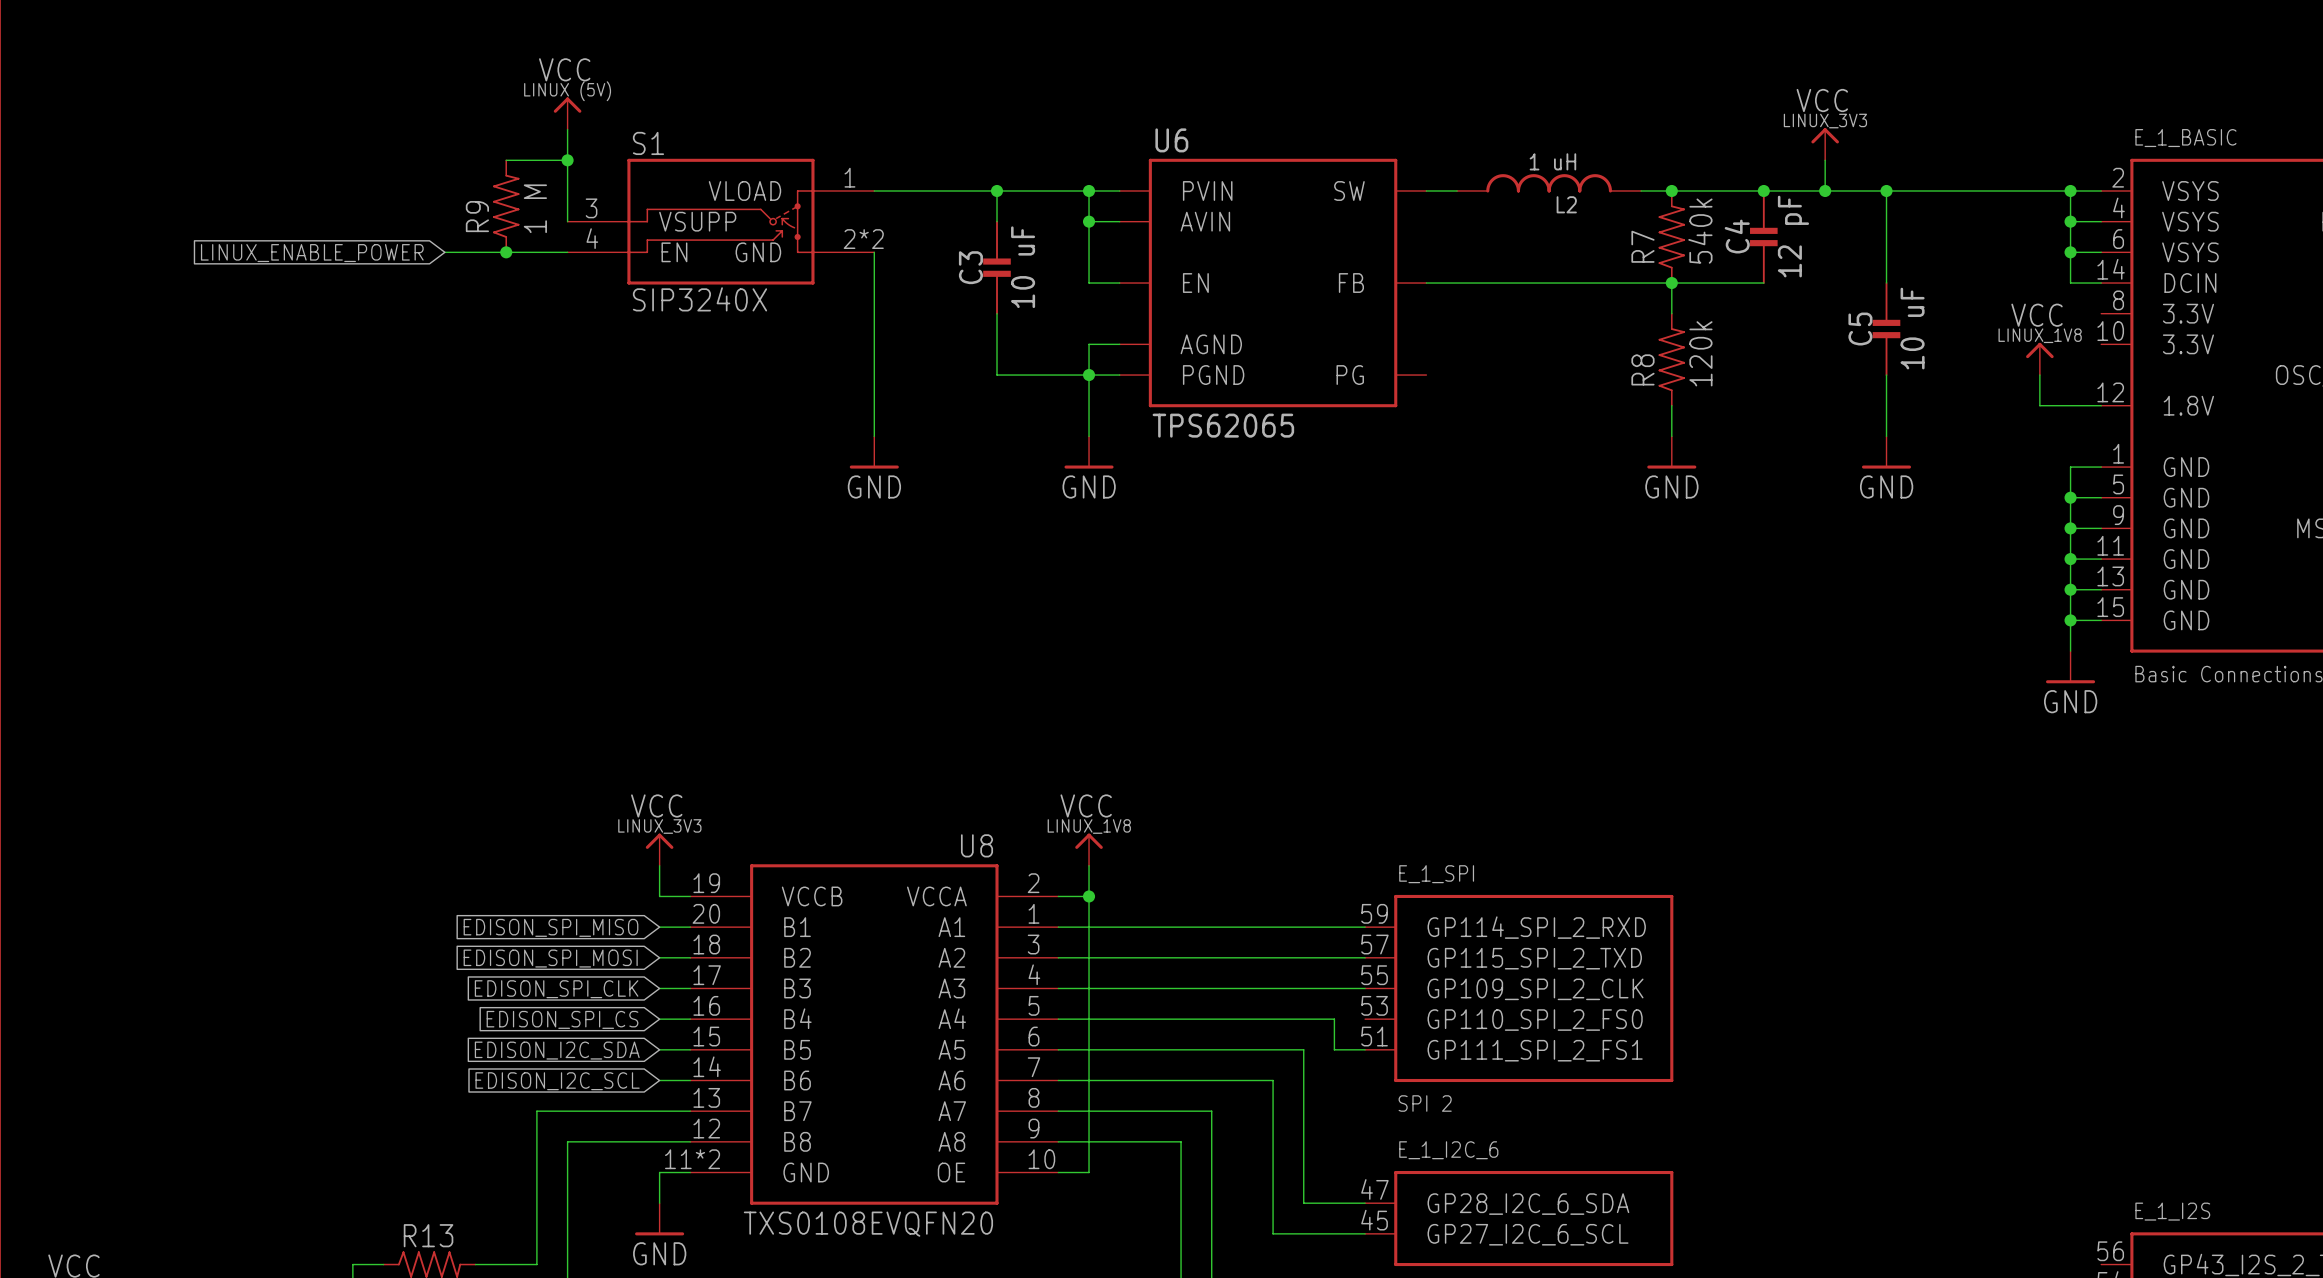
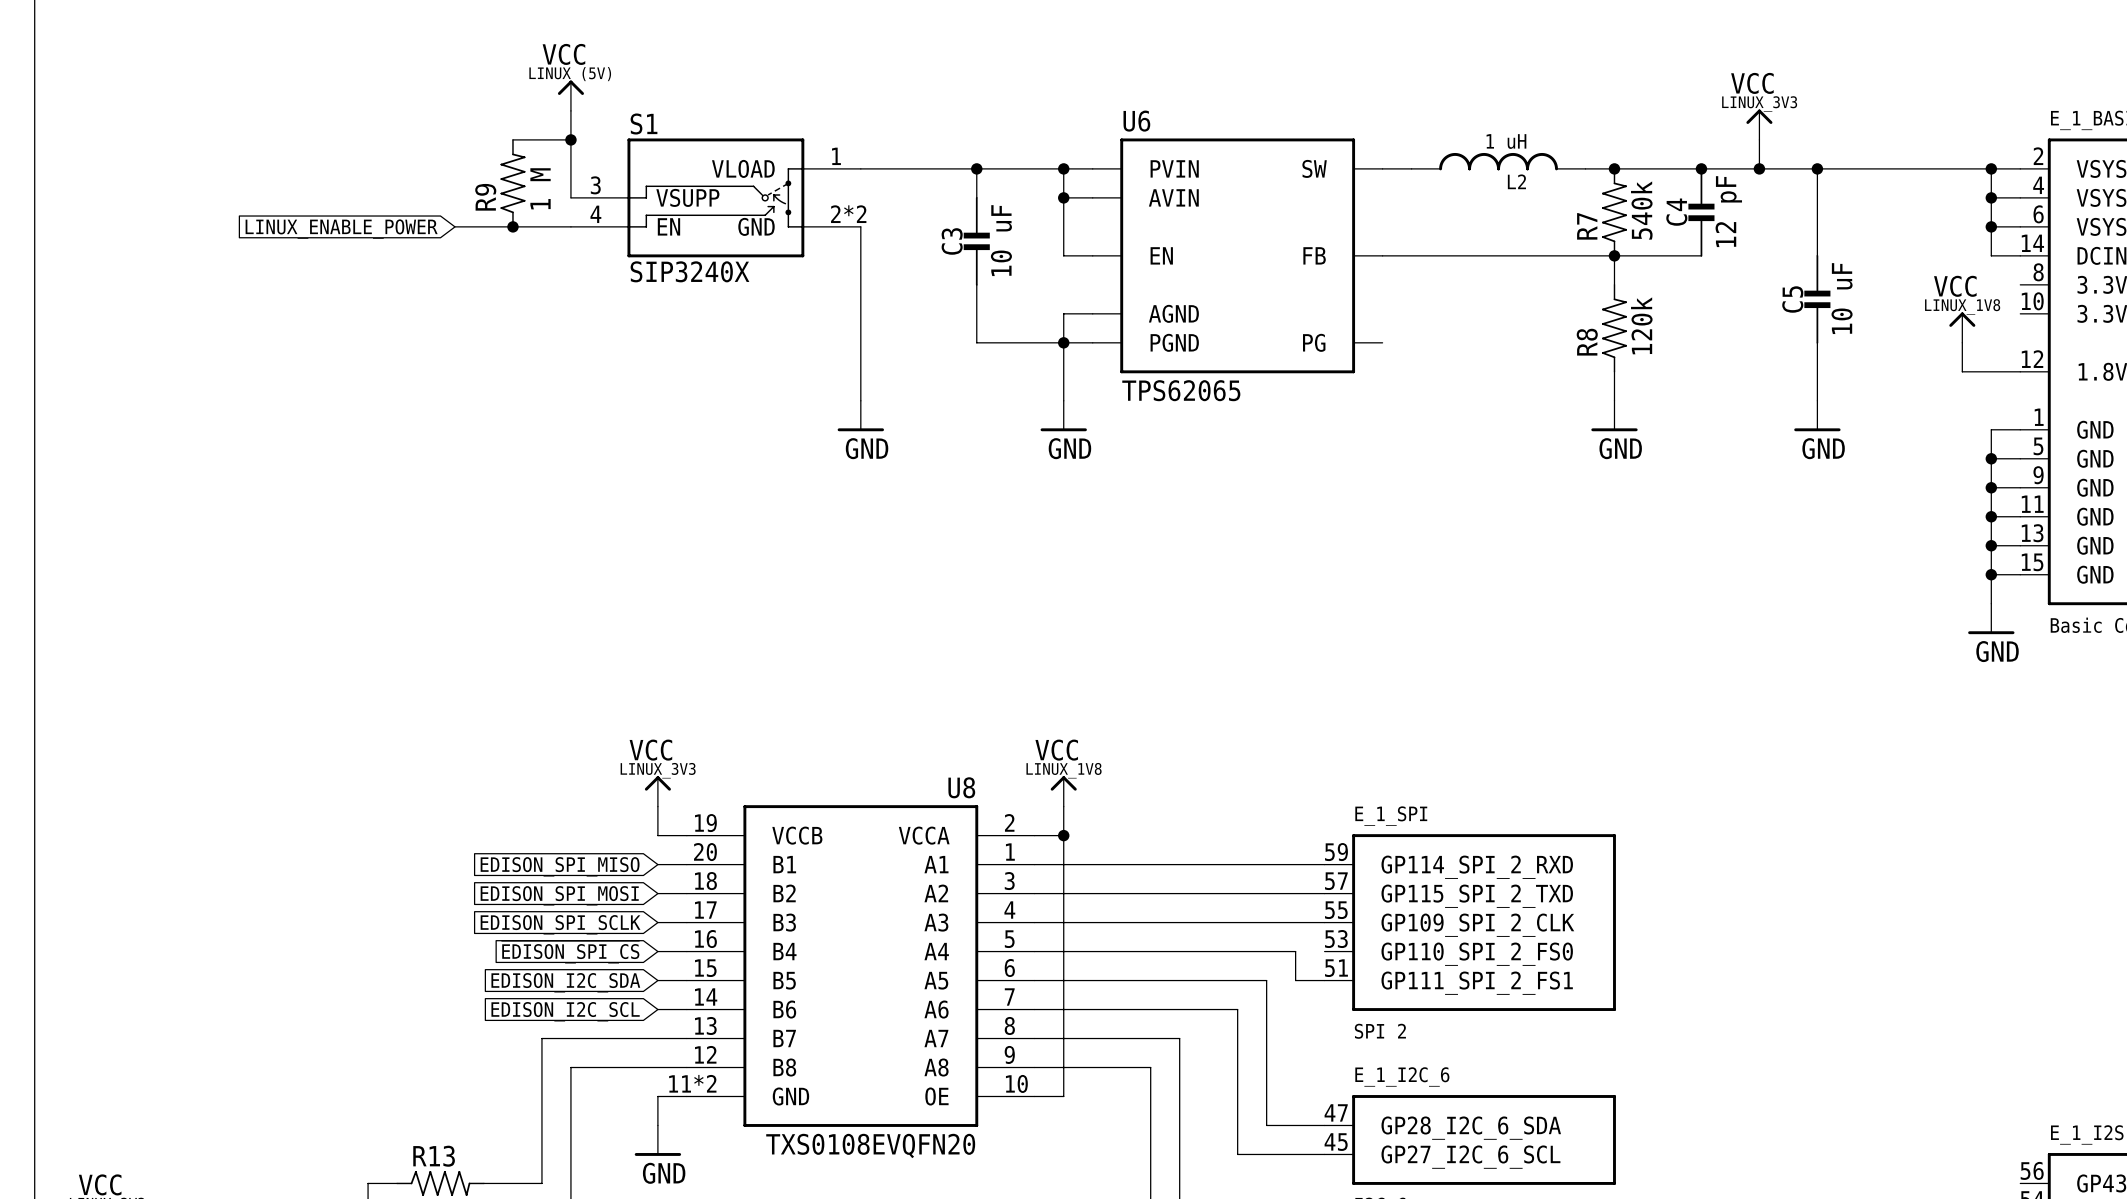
global label: EDISON_SPI_CLK (556, 989) -> EDISON_SPI_SCLK (560, 924)
global label: EDISON_SPI_CS (562, 1019) -> ~{EDISON_SPI_CS} (570, 952)

